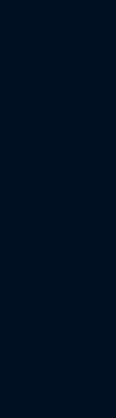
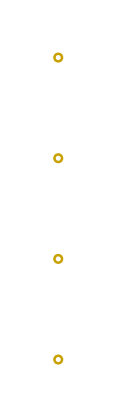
part: none -> (58, 57)
part: none -> (58, 158)
part: none -> (58, 258)
part: none -> (58, 359)

